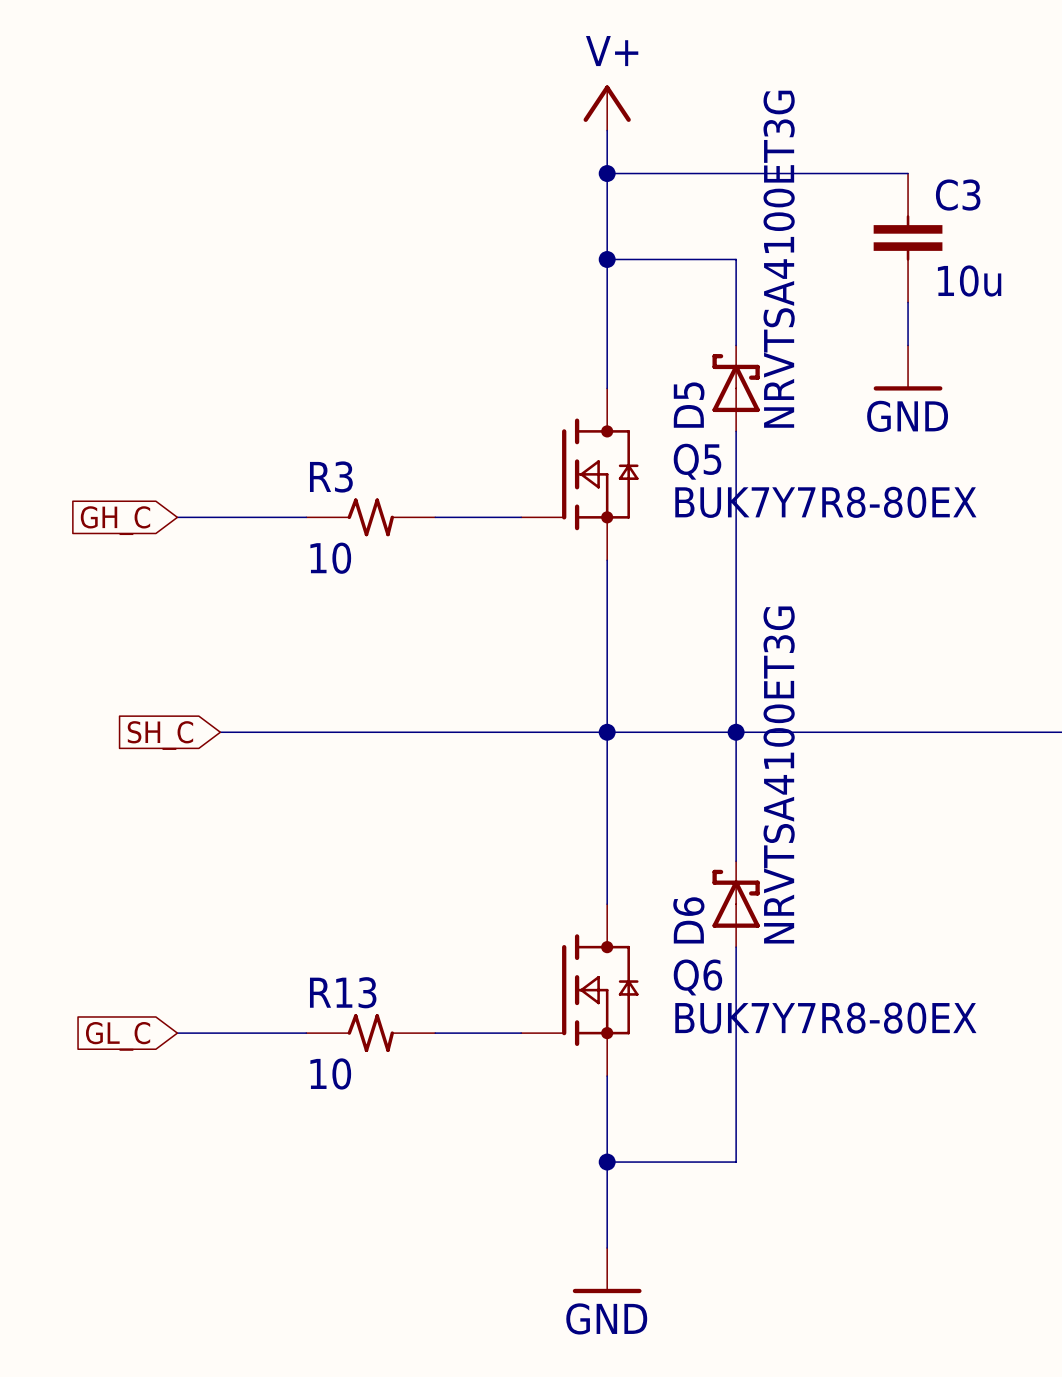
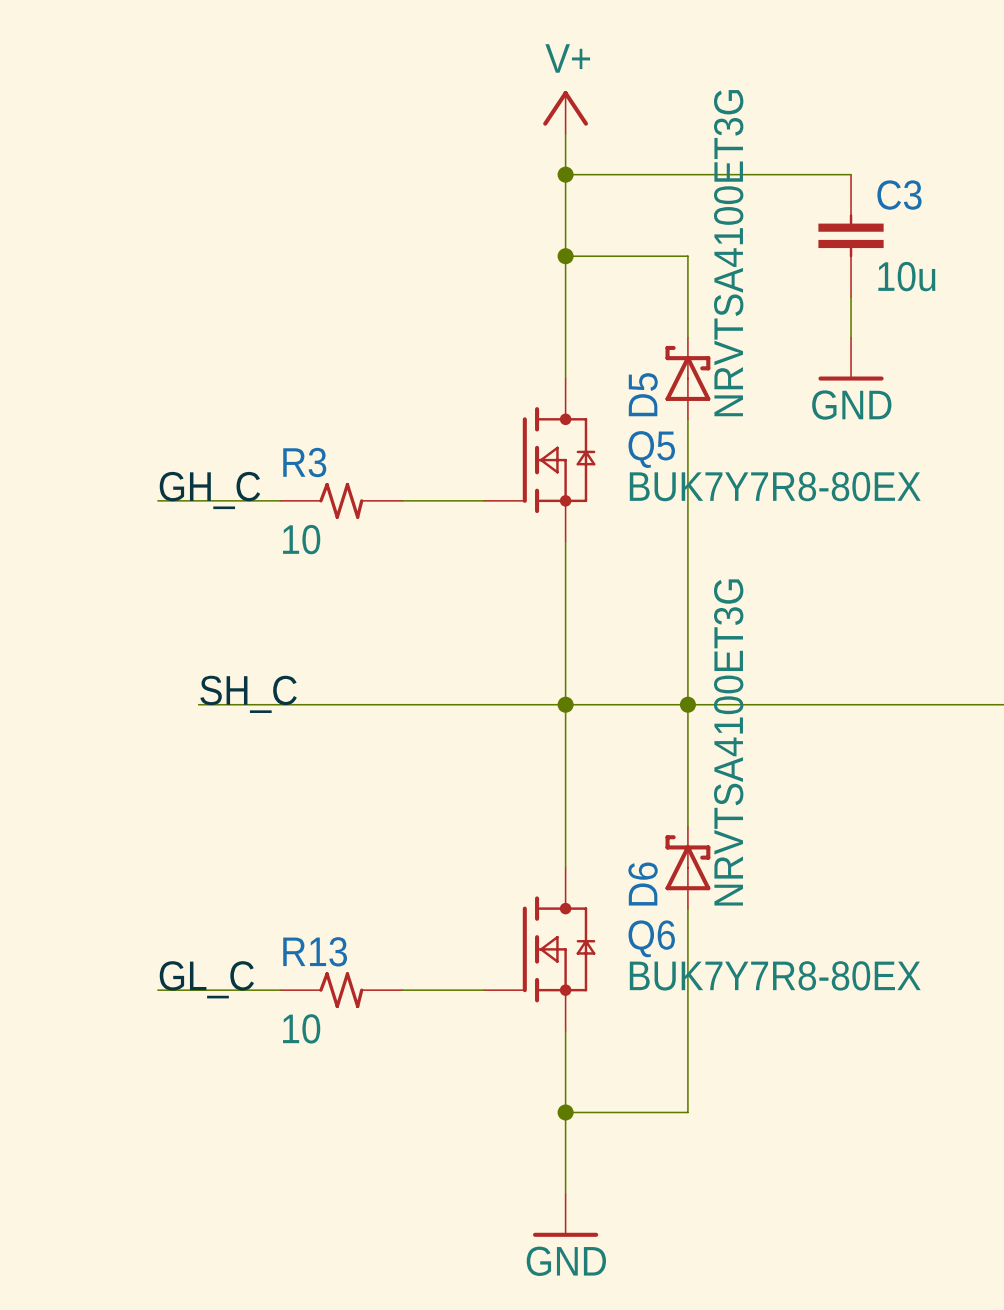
label: none -> GH_C (209, 490)
global label: GH_C (115, 520) -> none
label: none -> SH_C (248, 694)
global label: SH_C (160, 735) -> none
label: none -> GL_C (206, 979)
global label: GL_C (118, 1036) -> none

